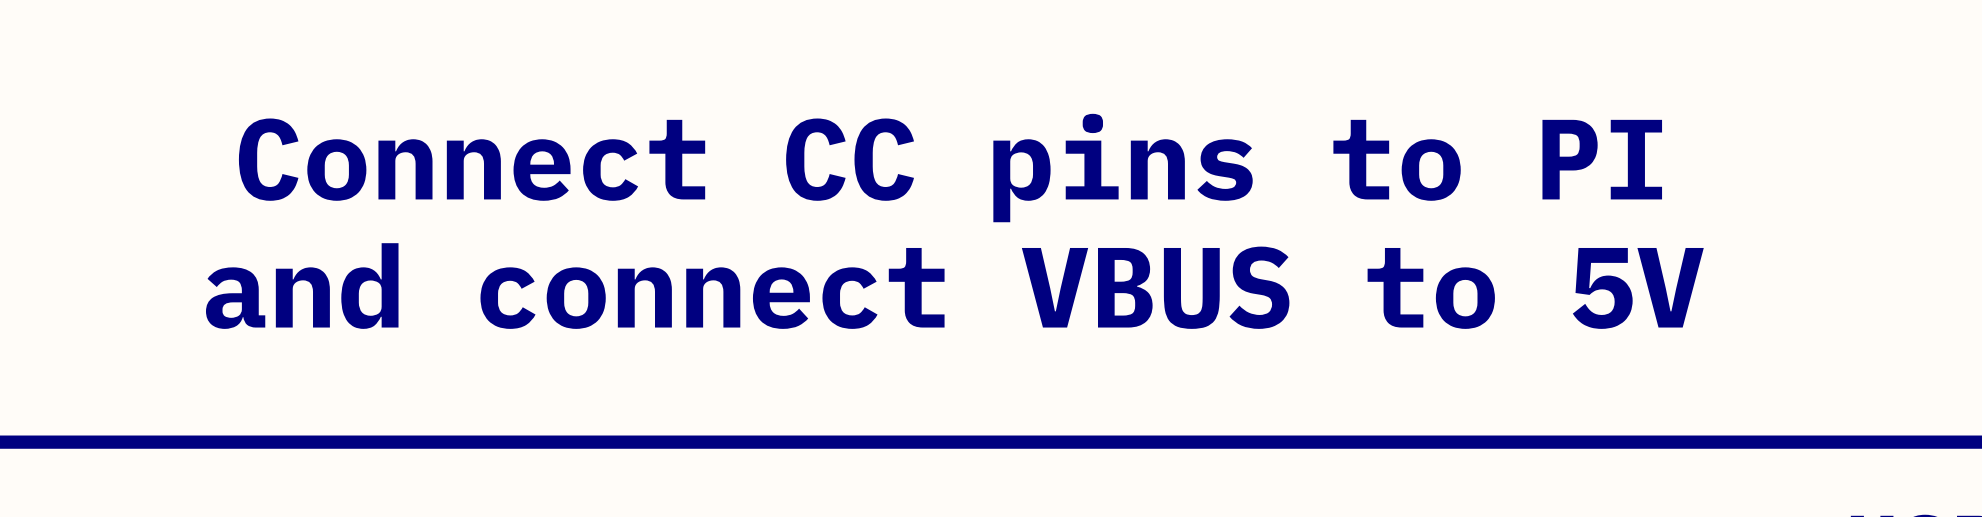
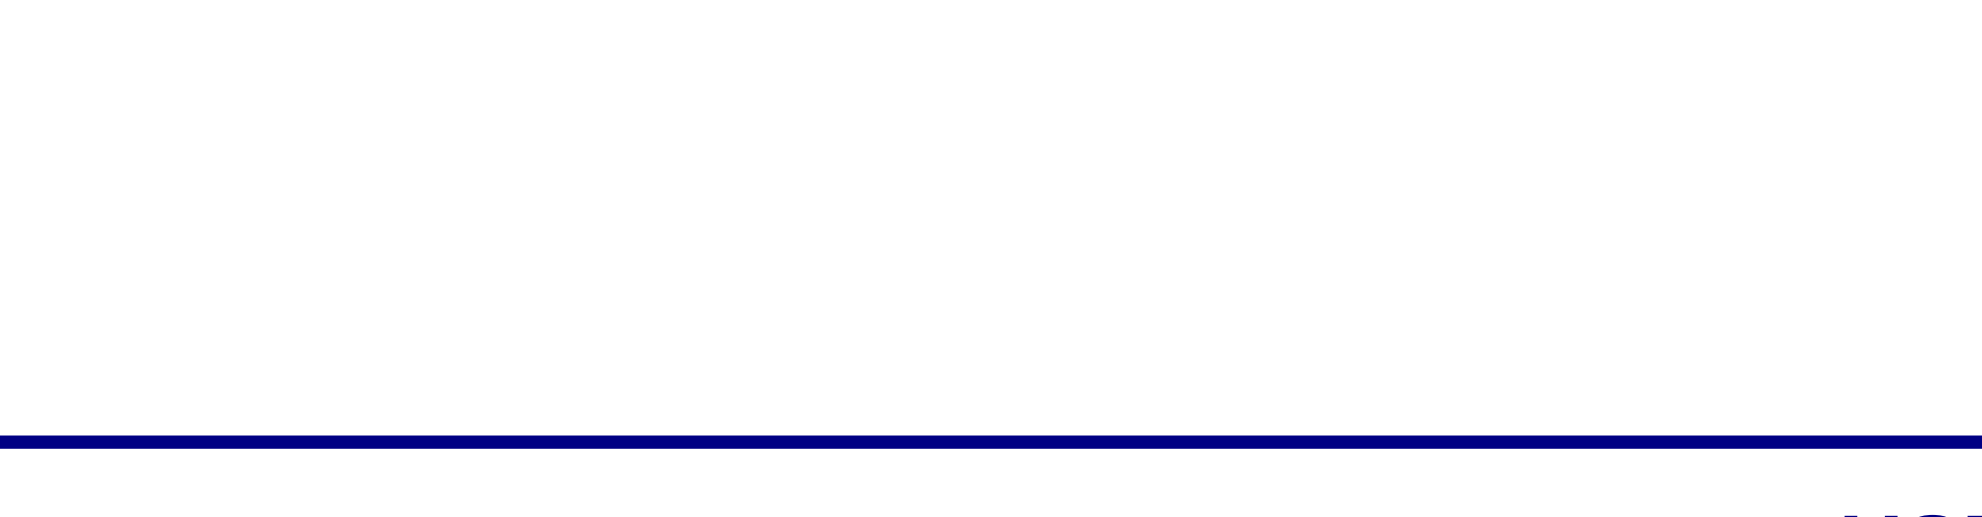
text: Connect CC pins to PI (950, 168) -> none
text: and connect VBUS to 5V (954, 286) -> none

